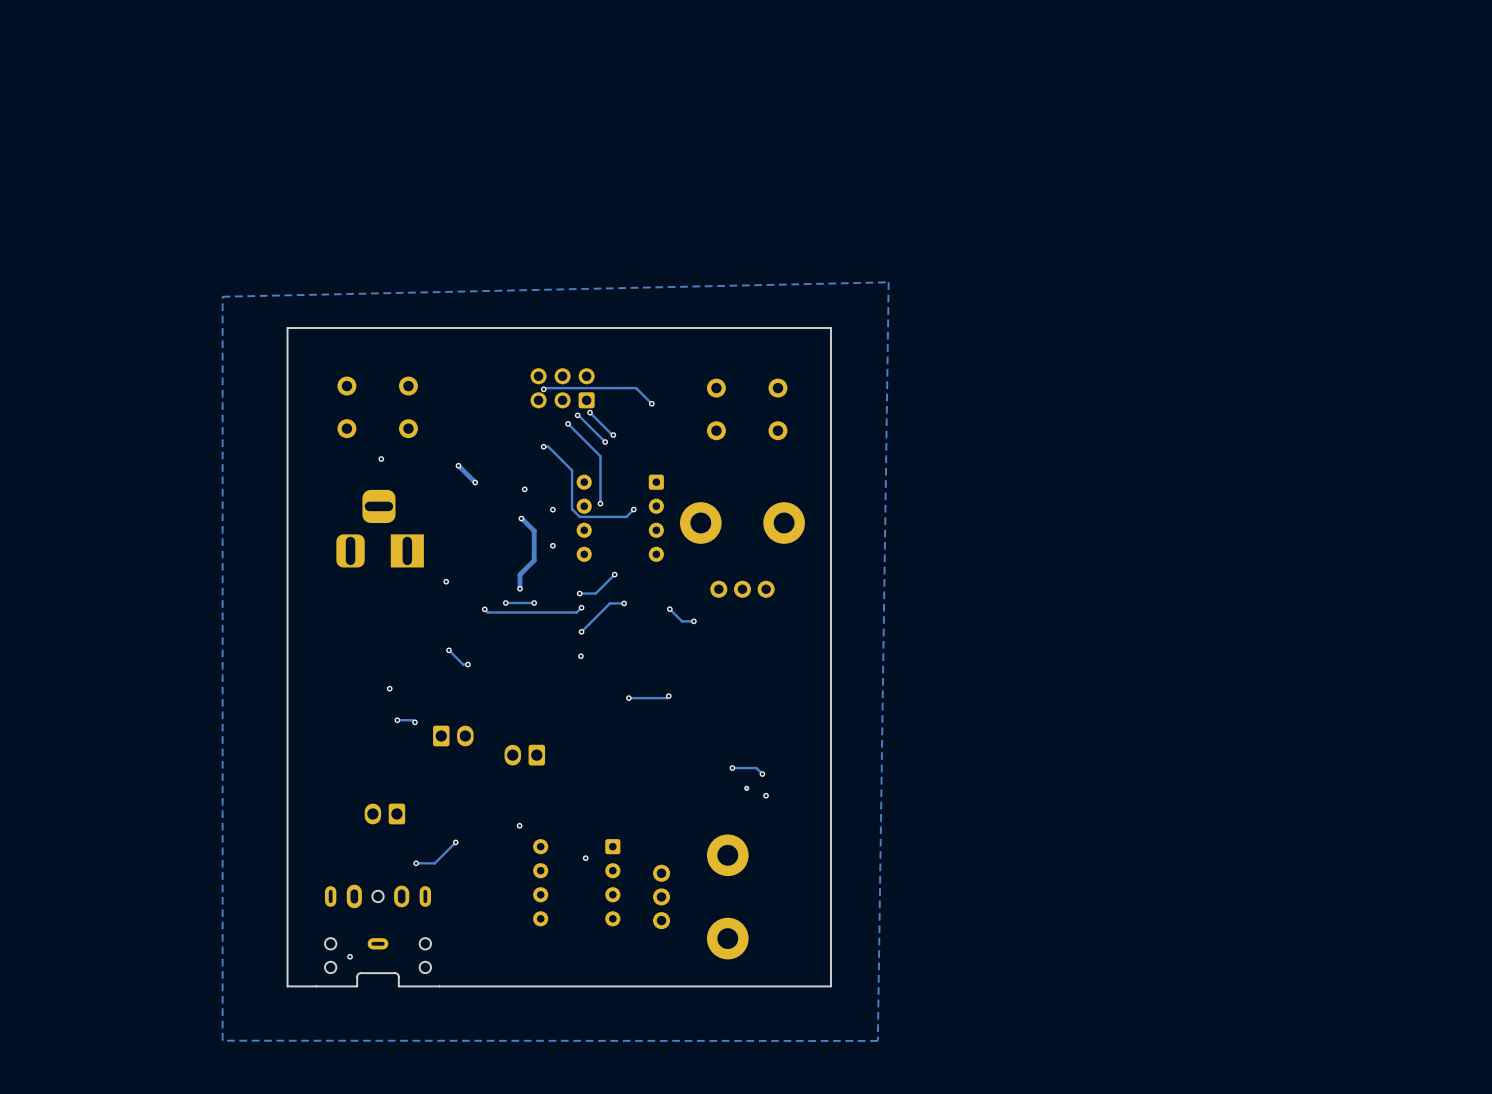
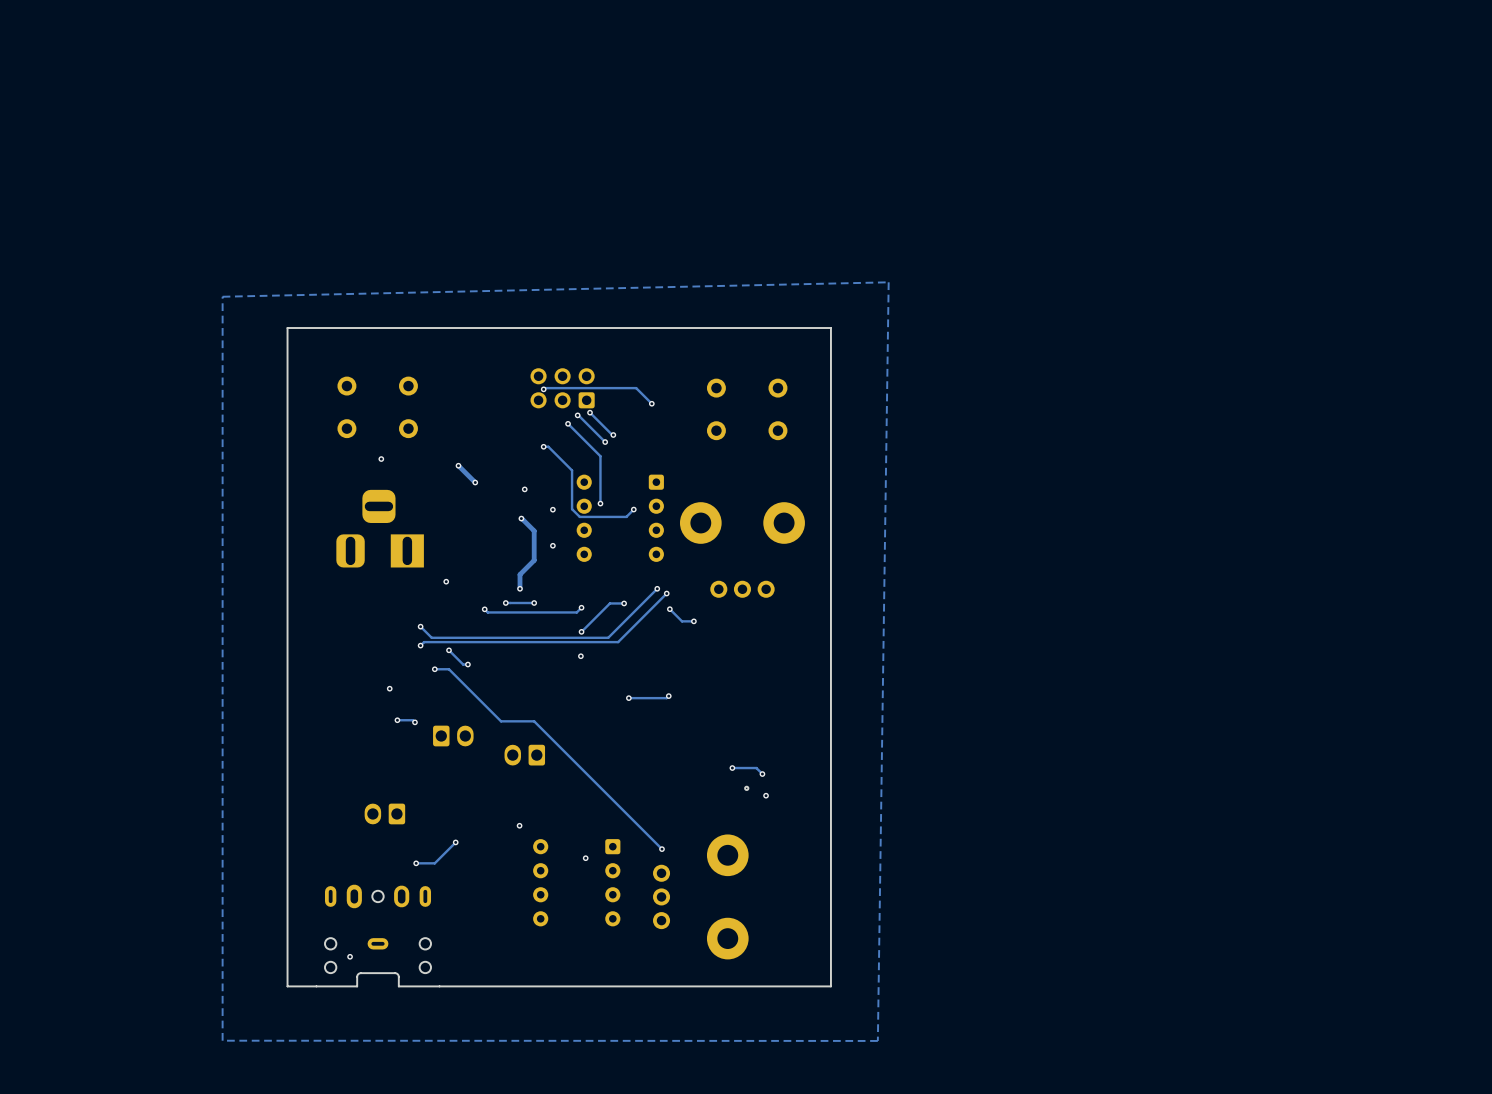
track: (614, 574) (595, 593) (579, 593) -> none
via: (614, 574) -> none
track: none -> (657, 588) (608, 637) (431, 637) (420, 626)
via: none -> (657, 588)
via: (579, 593) -> none
track: none -> (666, 593) (618, 642) (424, 642) (420, 645)
via: none -> (666, 593)
via: none -> (420, 626)
via: none -> (420, 645)
track: none -> (434, 669) (449, 669) (501, 721) (534, 721) (662, 849)
via: none -> (434, 669)
via: none -> (662, 849)

